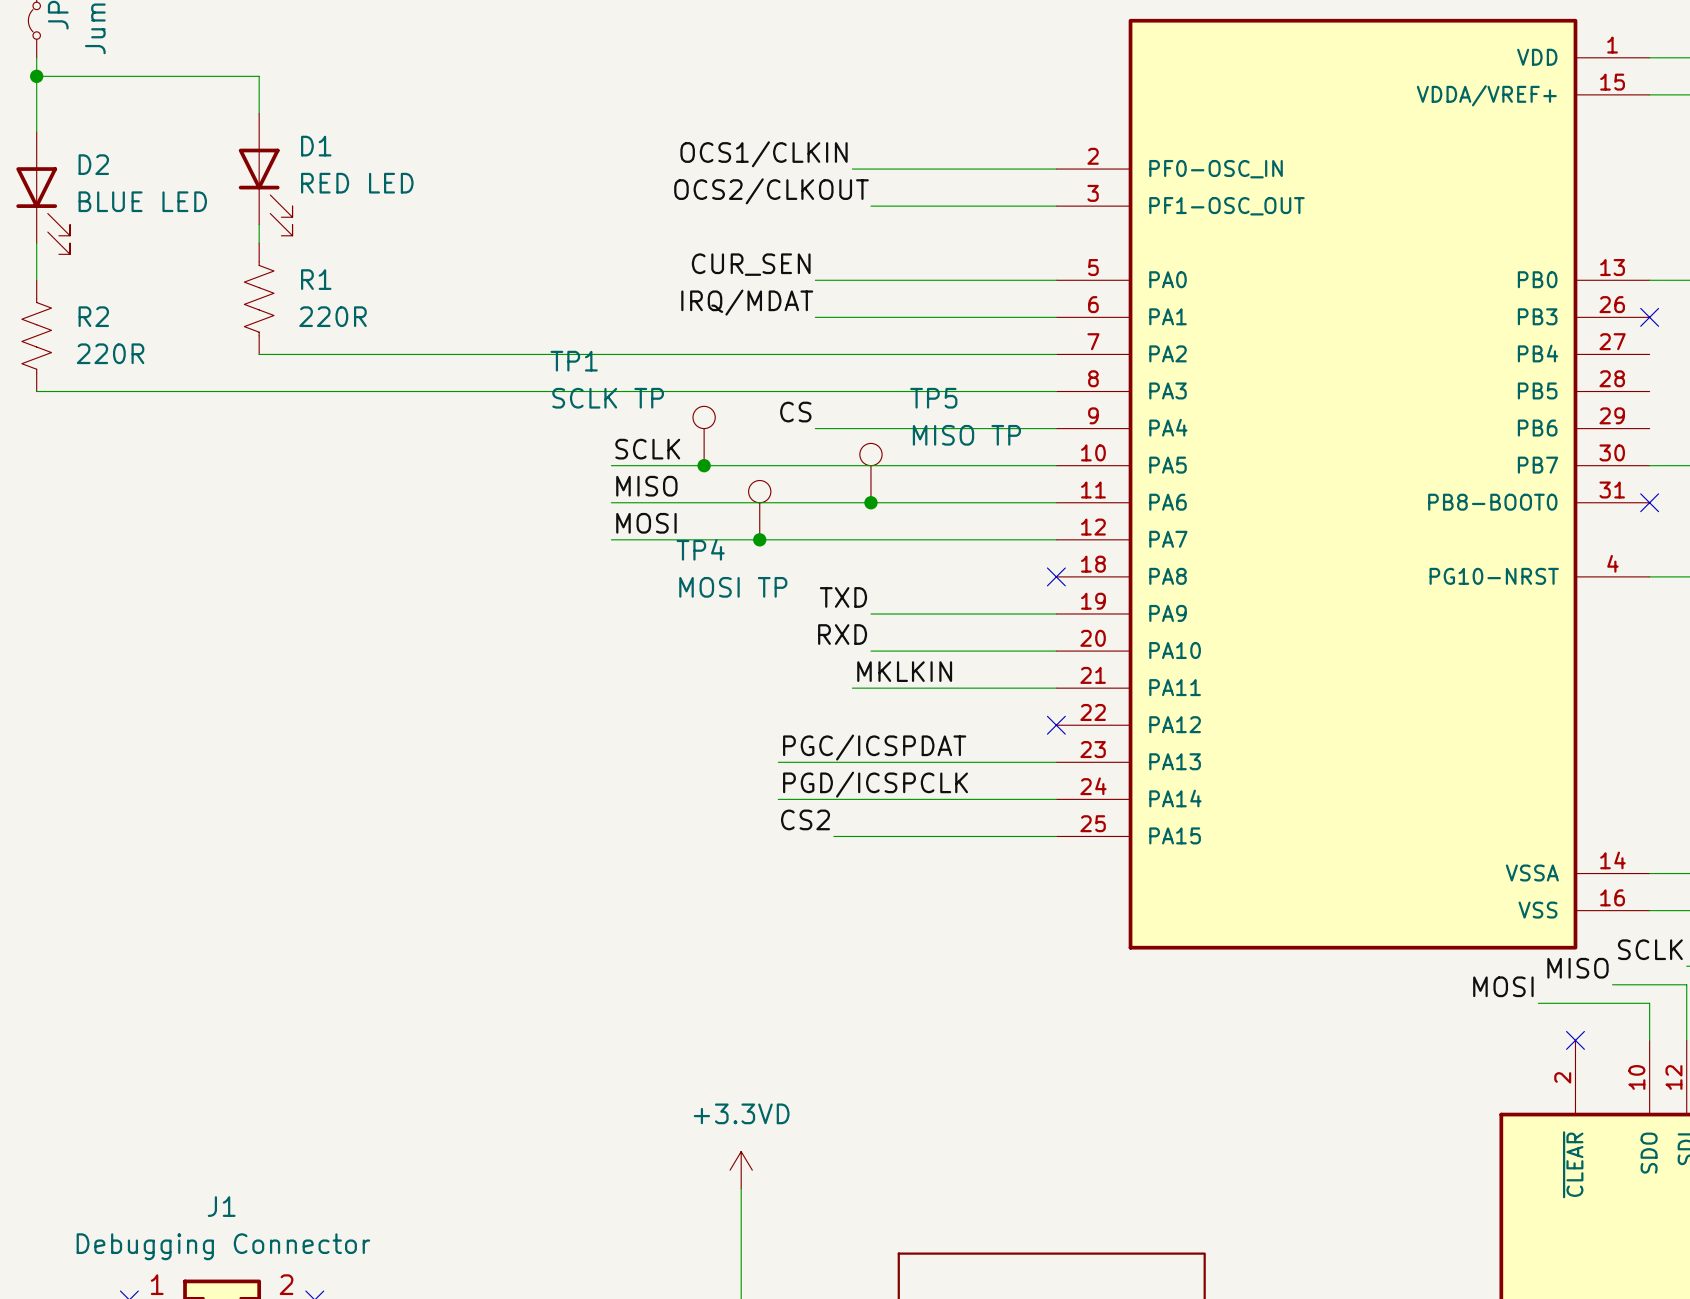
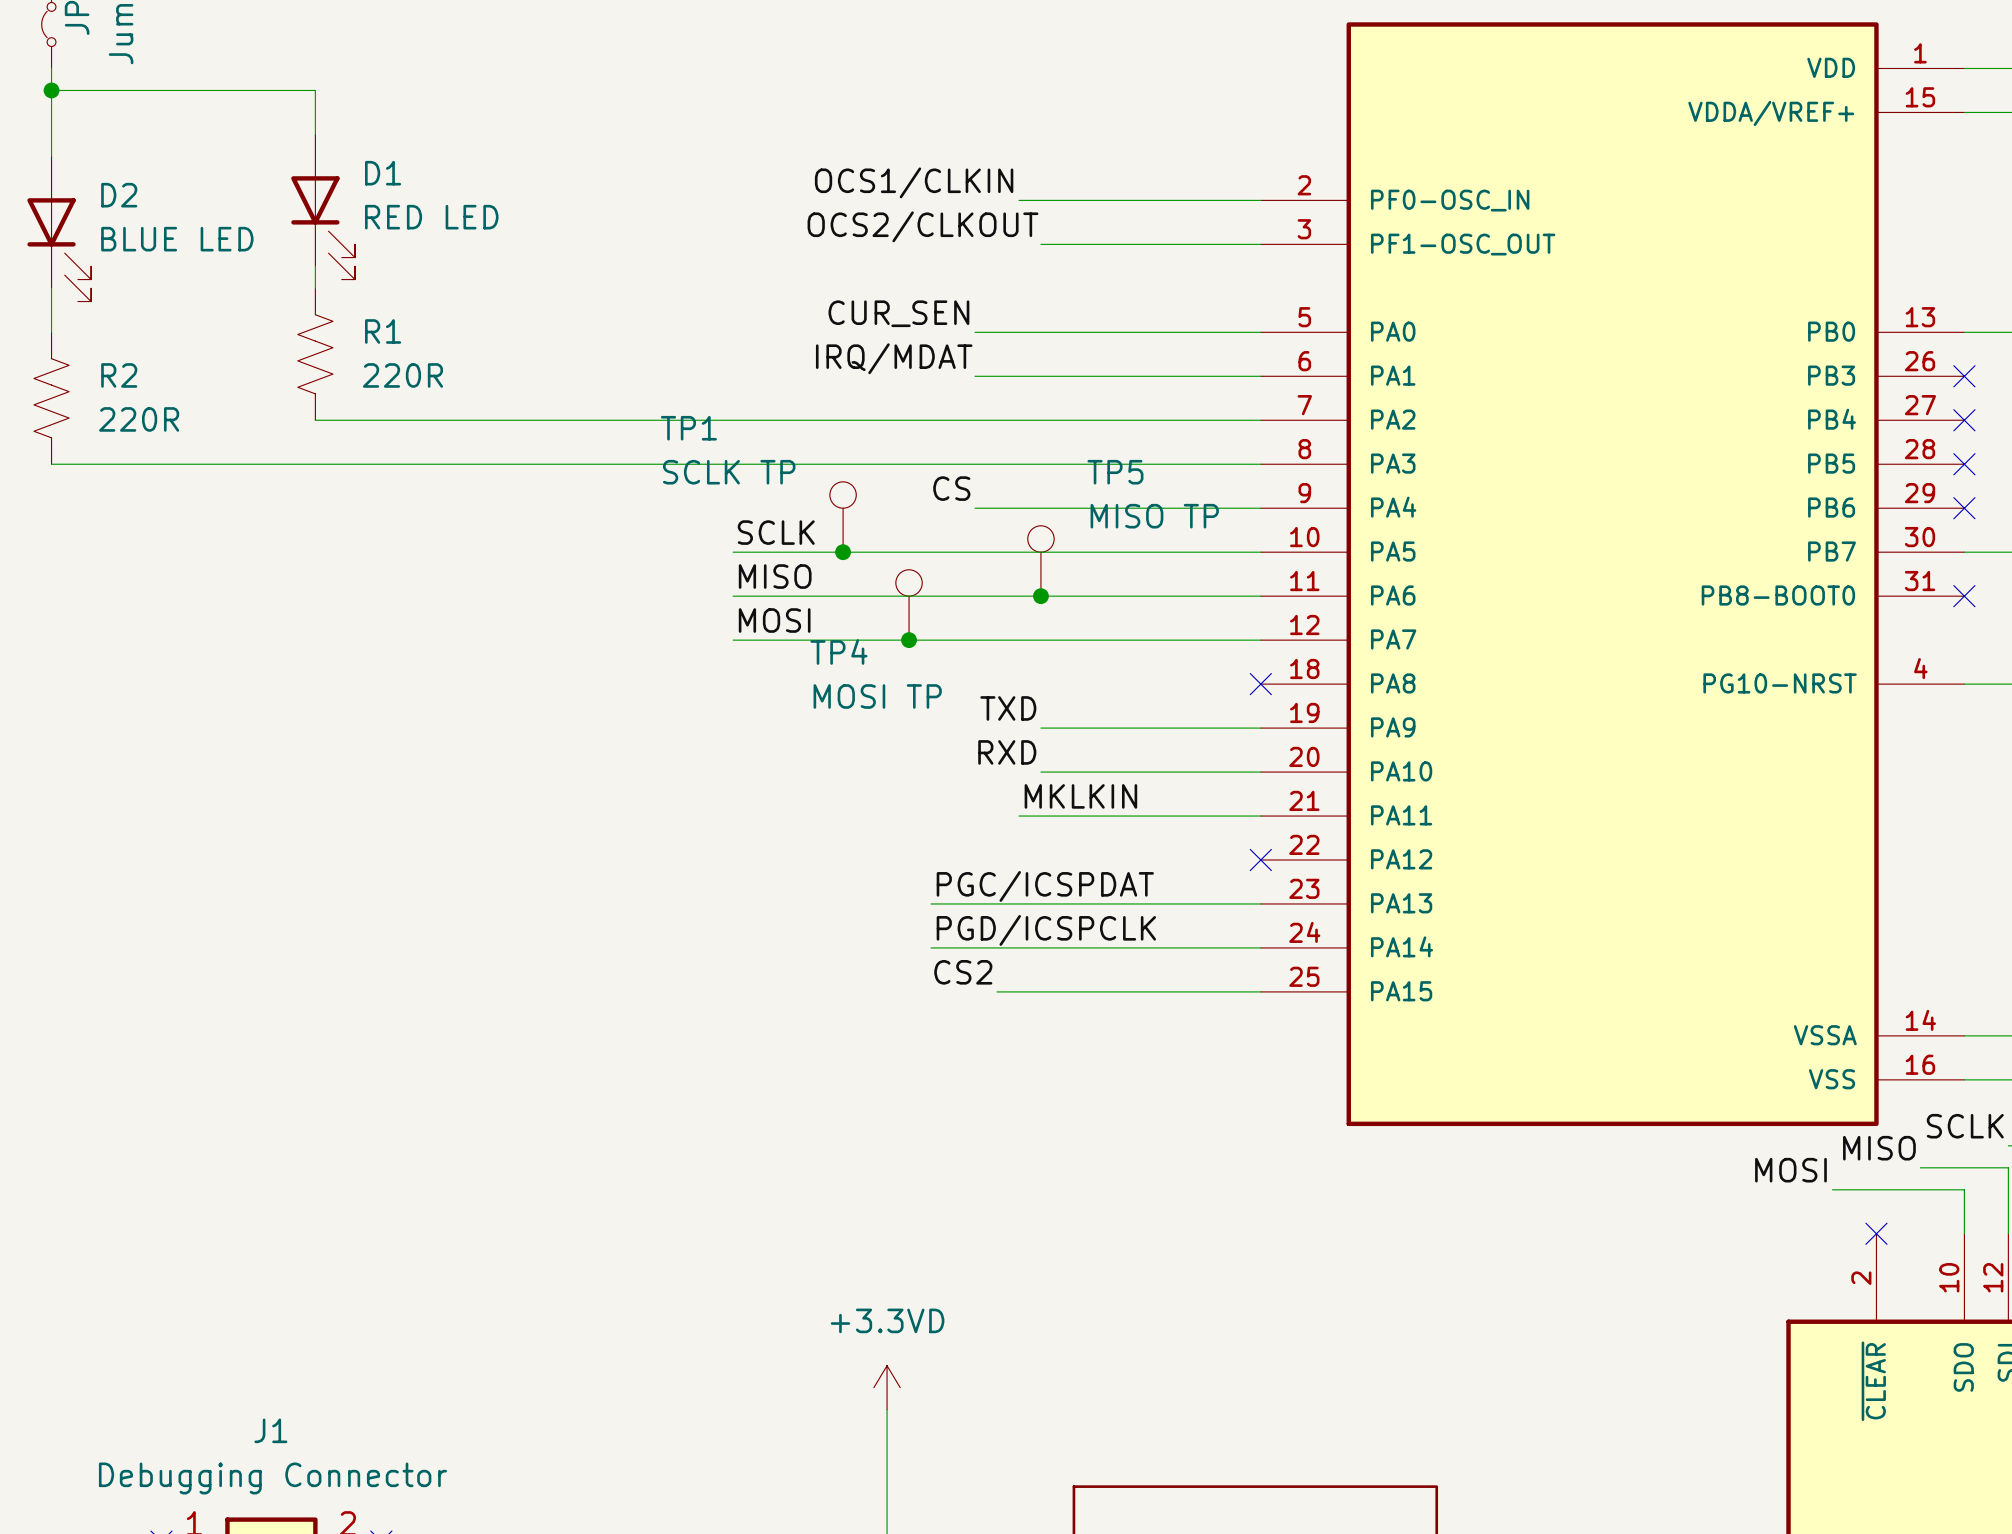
no-connect mark: none -> (1964, 420)
no-connect mark: none -> (1964, 464)
no-connect mark: none -> (1964, 508)

